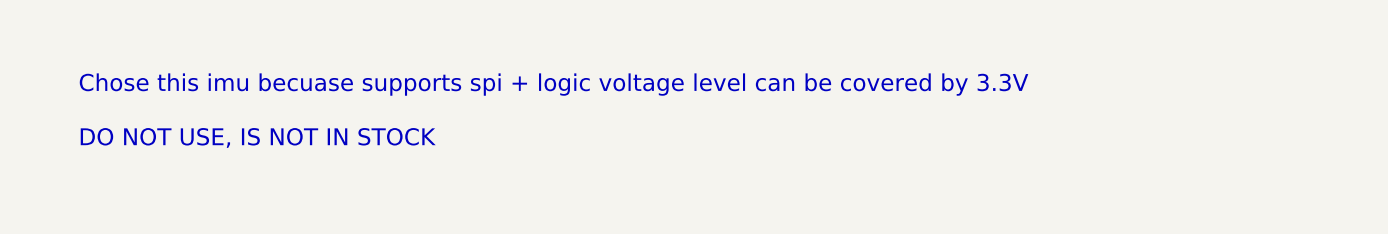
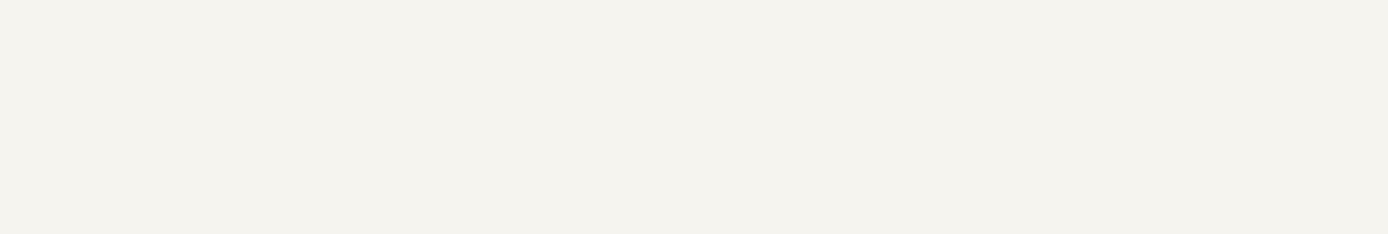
text: Chose this imu becuase supports spi + logic voltage level can be covered by 3.3V (554, 84) -> none
text: DO NOT USE, IS NOT IN STOCK (258, 137) -> none

